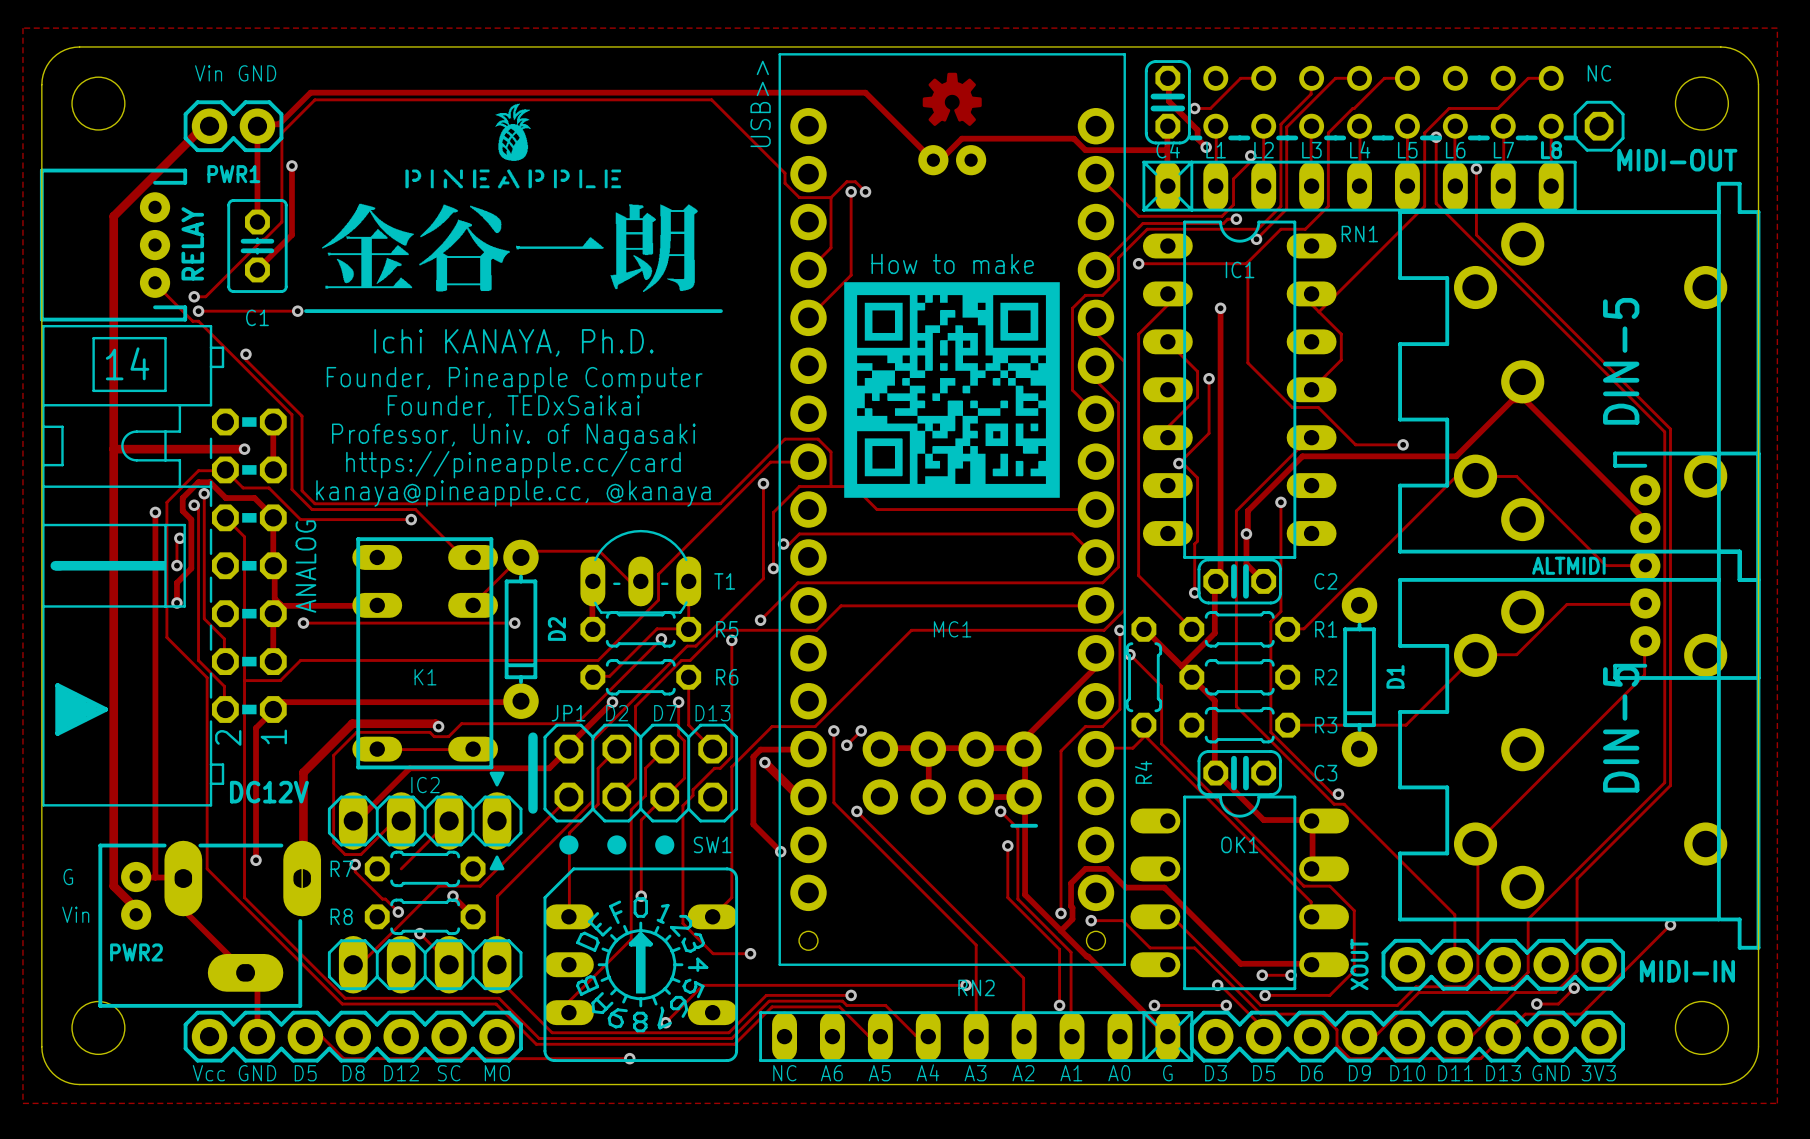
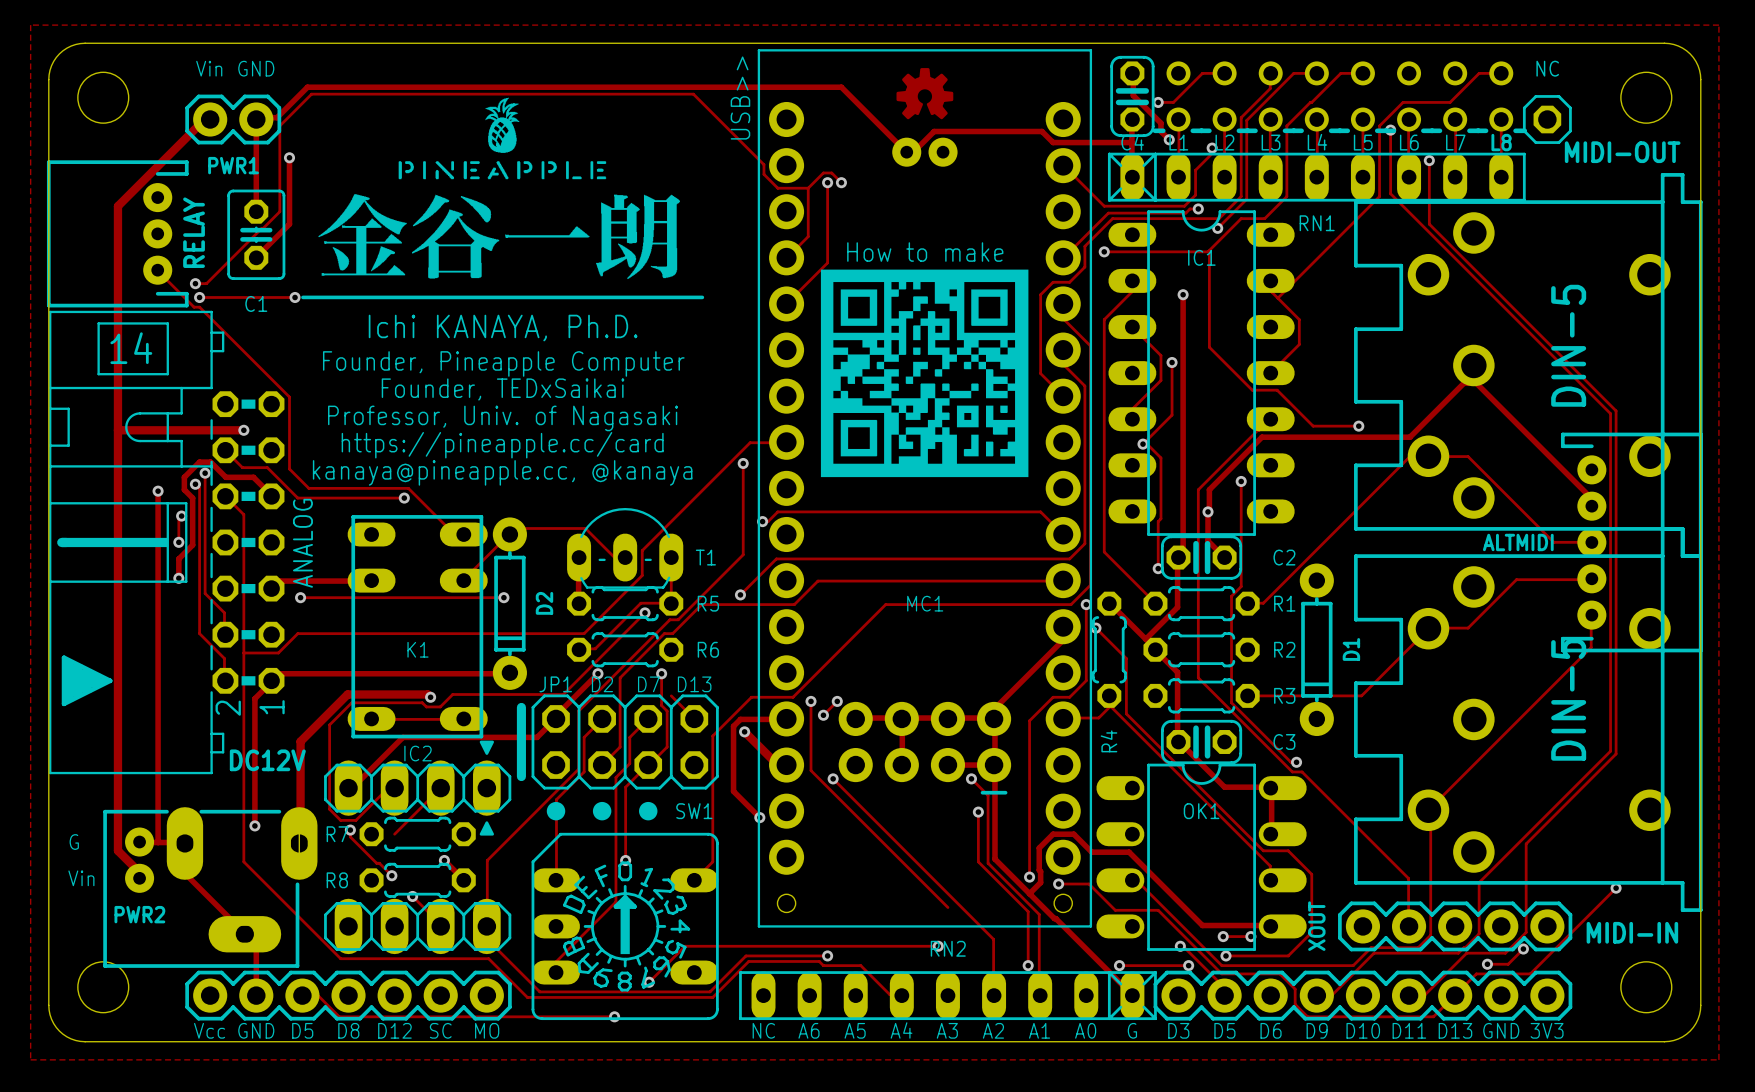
track: (245, 354) (245, 360) (302, 416) (302, 490) (314, 503) (720, 503) (785, 439) (818, 439) (831, 452) (831, 486) -> none
via: (245, 354) -> none
track: (273, 422) (273, 469) -> none
track: (225, 470) (198, 470) (166, 502) (166, 637) (207, 677) (207, 868) (342, 1004) (496, 1004) (536, 1044) (734, 1044) (772, 1006) (839, 1006) (868, 1035) (880, 1036) -> none
track: (1095, 509) (877, 509) (854, 486) (799, 486) (773, 512) (773, 568) -> none
track: (273, 516) (274, 598) (280, 604) (273, 613) (273, 661) -> none
via: (773, 568) -> none
track: (731, 640) (731, 756) (720, 768) (714, 768) (693, 789) (693, 795) (682, 805) (682, 923) (713, 953) (750, 953) -> none
via: (731, 640) -> none
track: (688, 677) (688, 725) -> none
track: (568, 797) (480, 886) (438, 886) (360, 963) (353, 964) -> none
track: (976, 945) (976, 1036) -> none
via: (750, 953) -> none

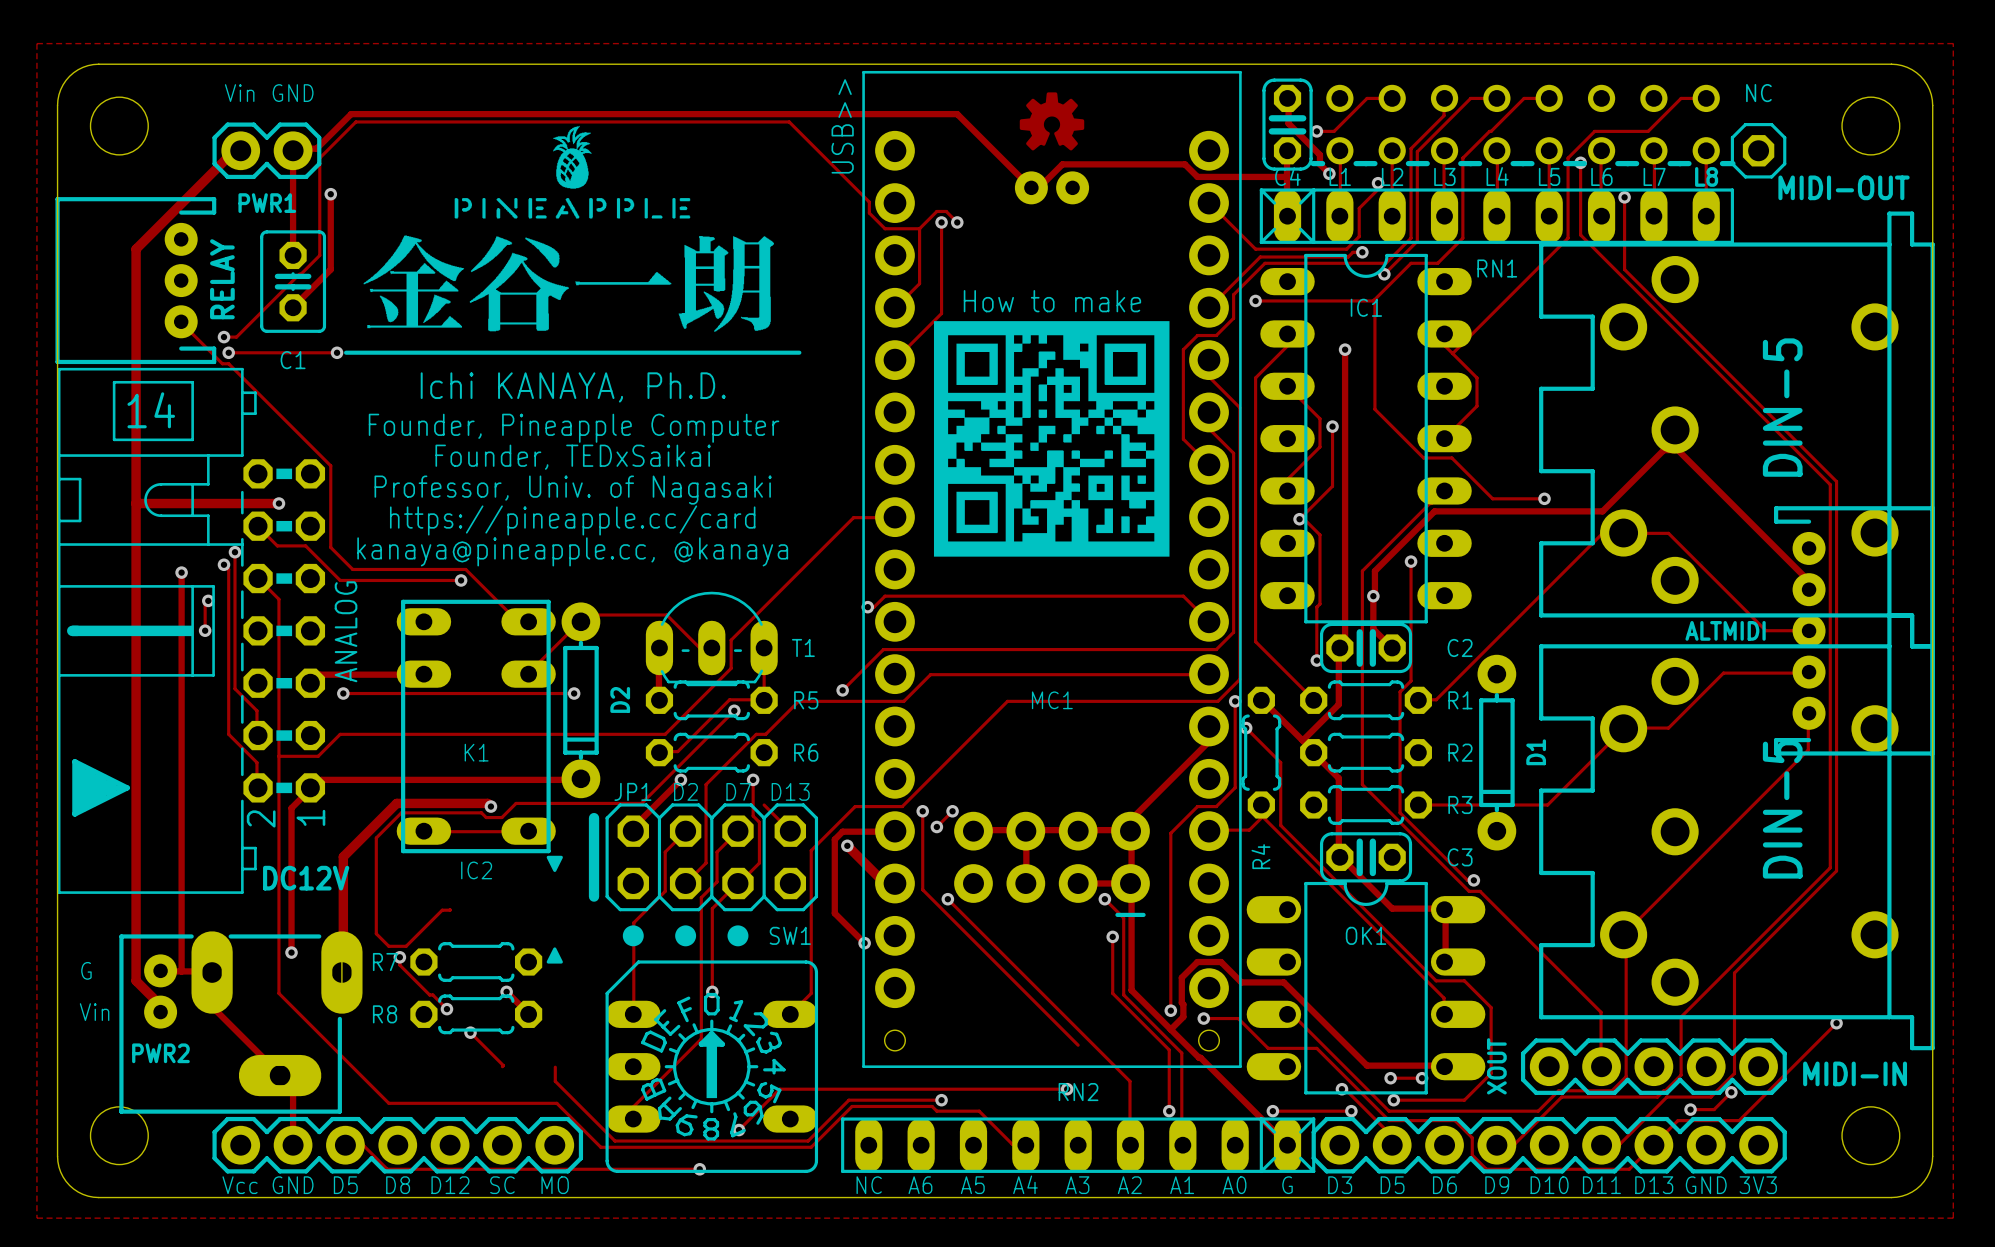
track: (743, 463) (743, 554) (678, 619) (669, 619) (578, 711) (578, 769) (487, 860) (487, 926) -> none
via: (743, 463) -> none
track: (271, 495) (253, 477) (225, 477) (210, 462) (199, 462) (184, 477) (184, 489) (192, 498) (192, 545) (178, 558) (178, 578) -> none
via: (178, 578) -> none
track: (555, 716) (556, 718) (537, 737) (402, 737) (353, 787) (348, 788) -> none
part: (417, 788) -> none
track: (440, 788) (394, 834) -> none
part: (417, 926) -> none

